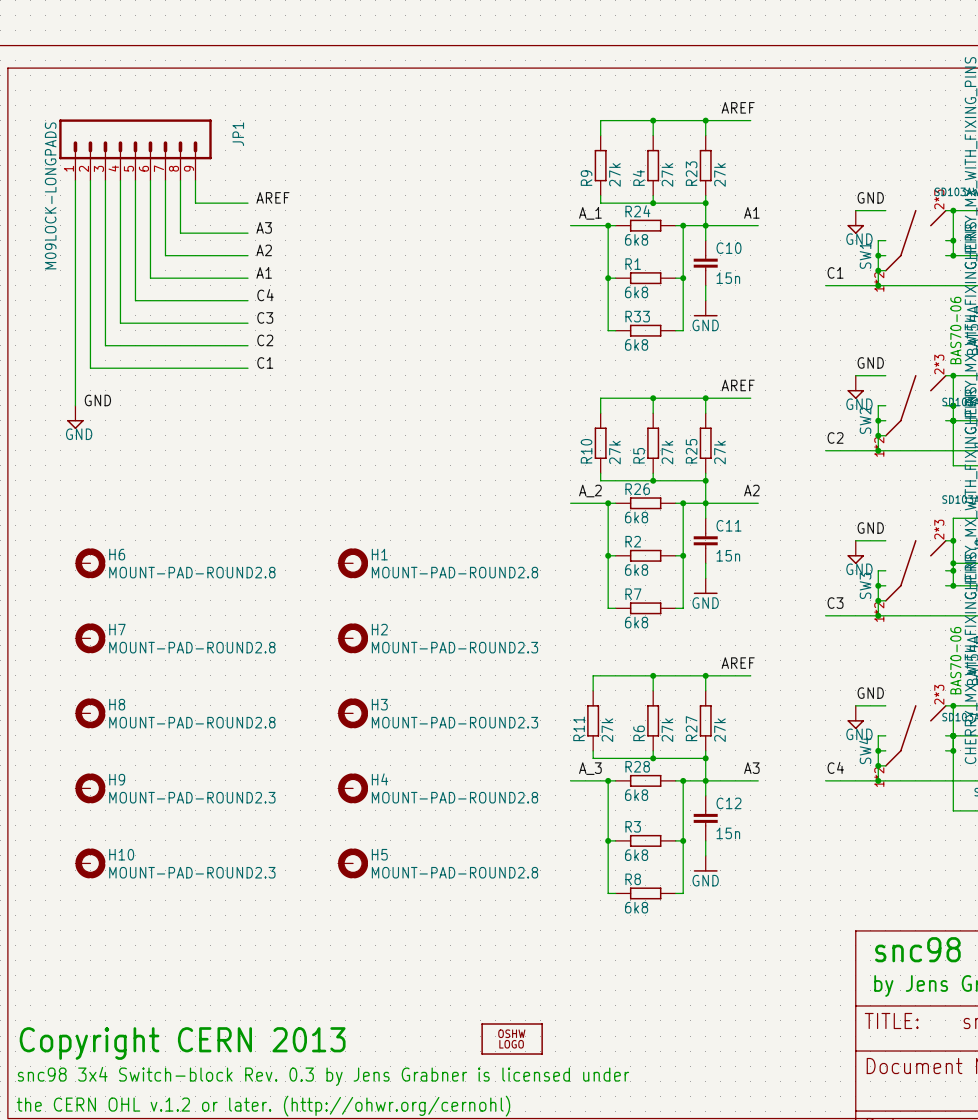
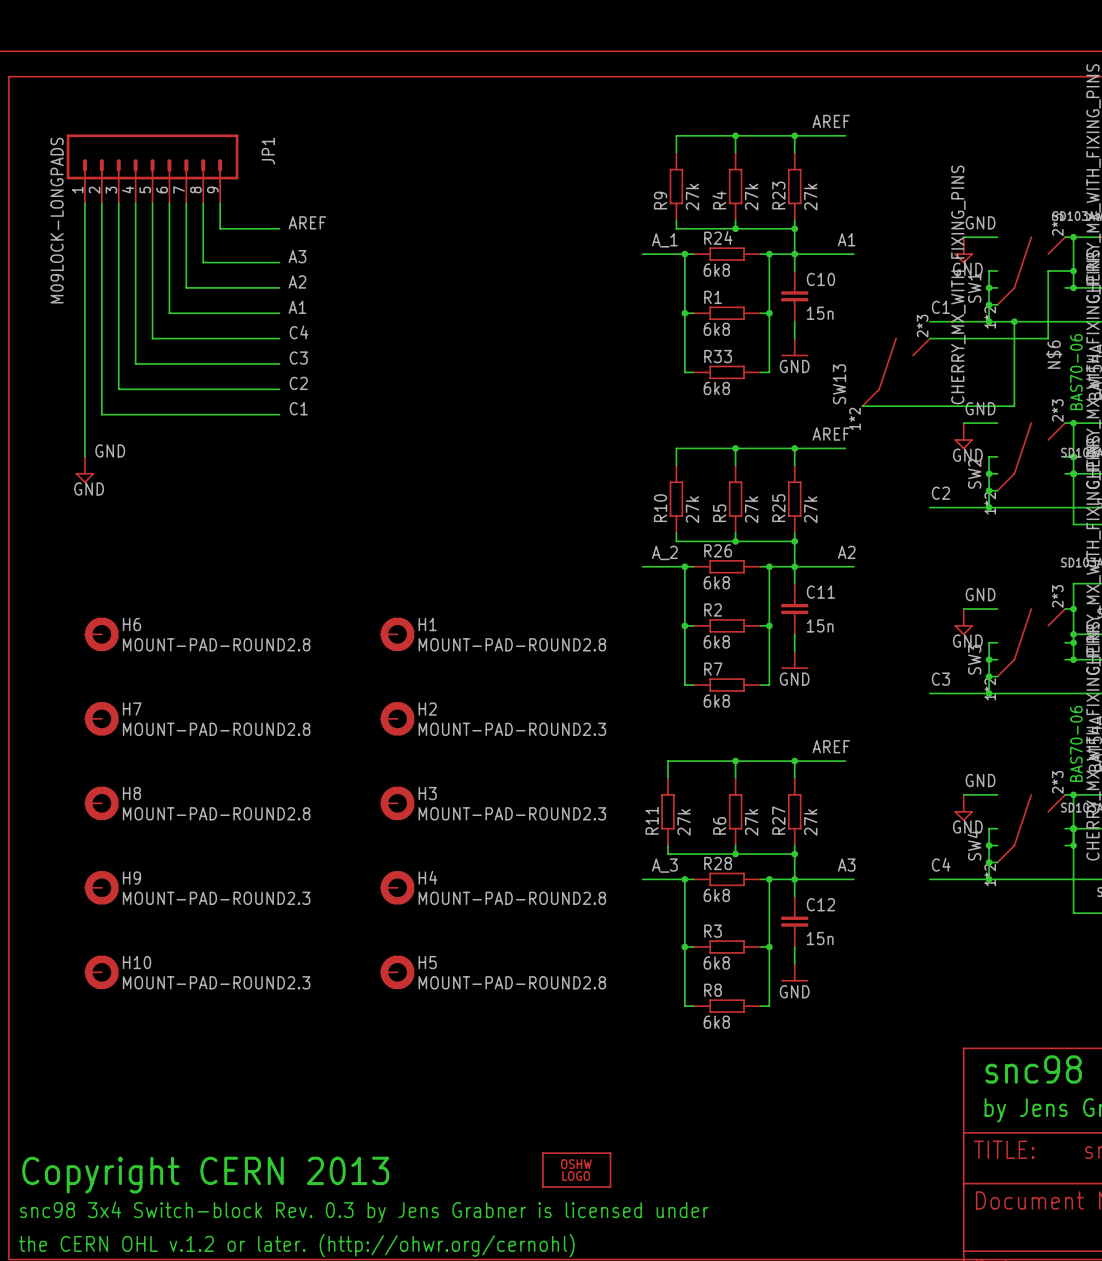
wire: none -> (1065, 271) (1048, 271) (1048, 338) (929, 338)
wire: none -> (1014, 321) (1014, 406) (862, 406)
junction: none -> (1014, 321)
label: none -> N$6 (1054, 354)
SW13: none -> CHERRY_MX_WITH_FIXING_PINS (896, 372)

